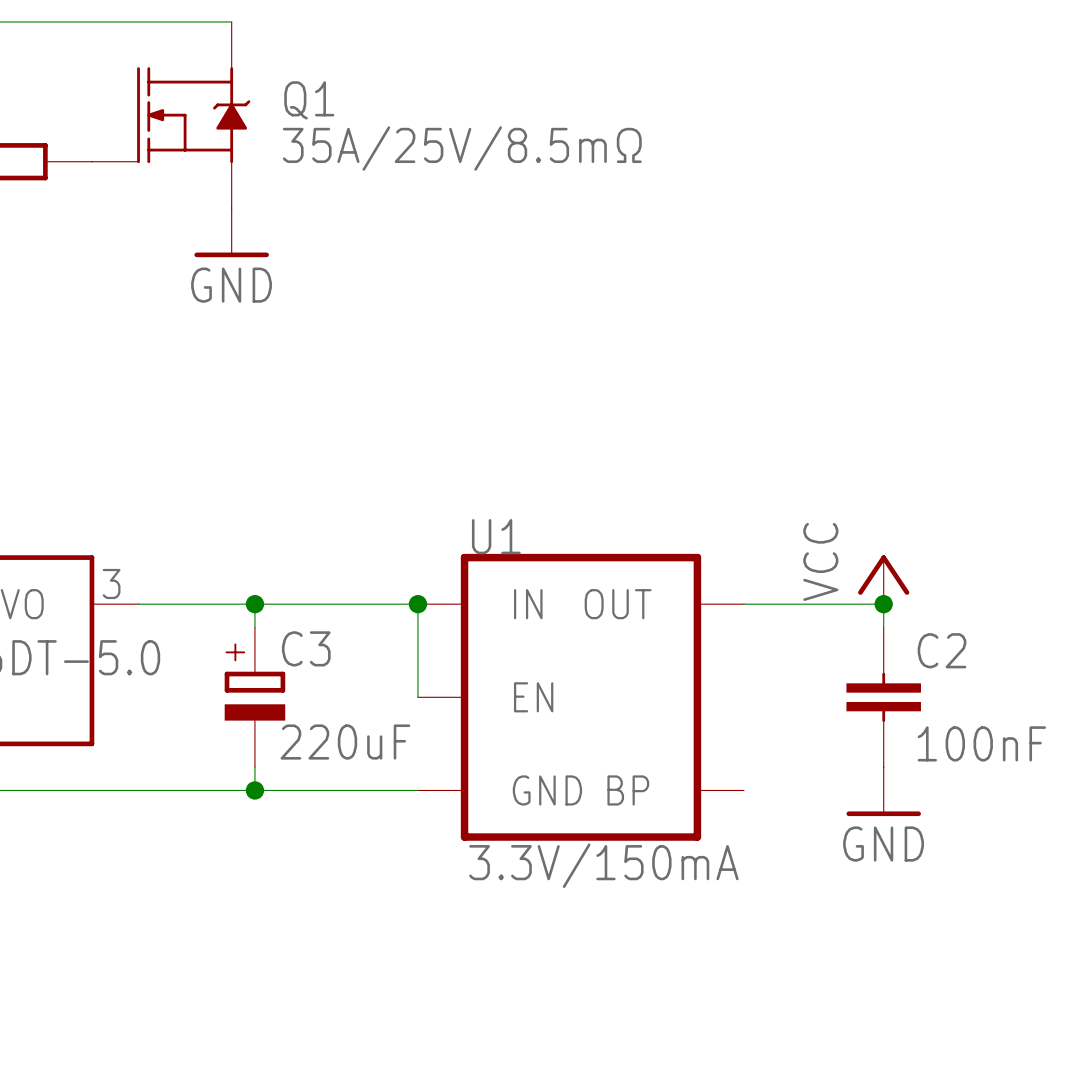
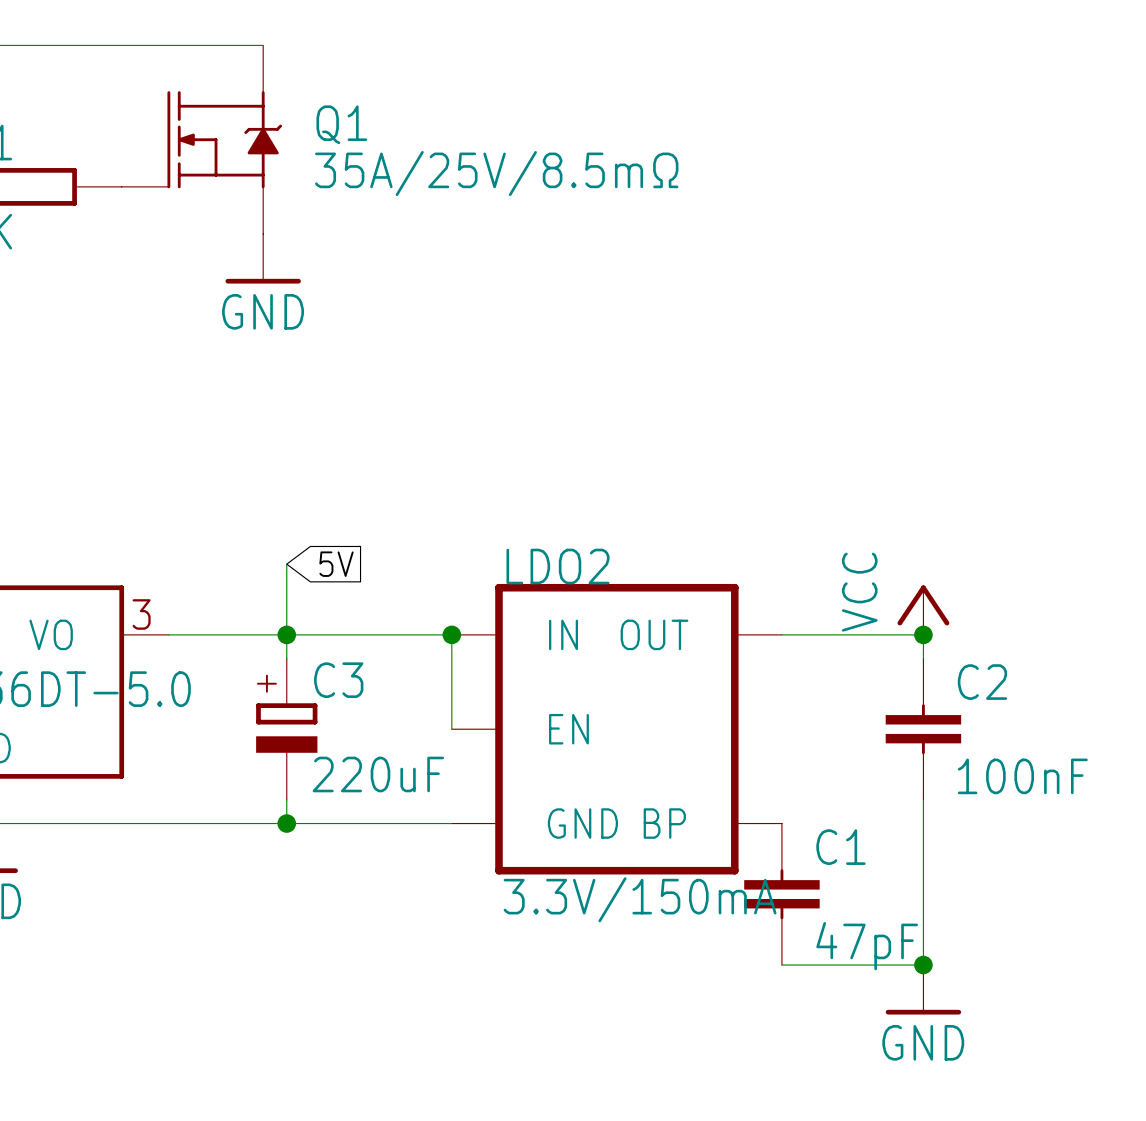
wire: none -> (286, 564) (286, 634)
global label: none -> 5V (336, 564)
U1 name: U1 (496, 536) -> LDO2 (558, 566)
wire: none -> (923, 799) (923, 965) (781, 965)
power symbol position: GND (883, 791) -> GND (923, 989)
C1: none -> 47pF (781, 894)
junction: none -> (923, 965)

